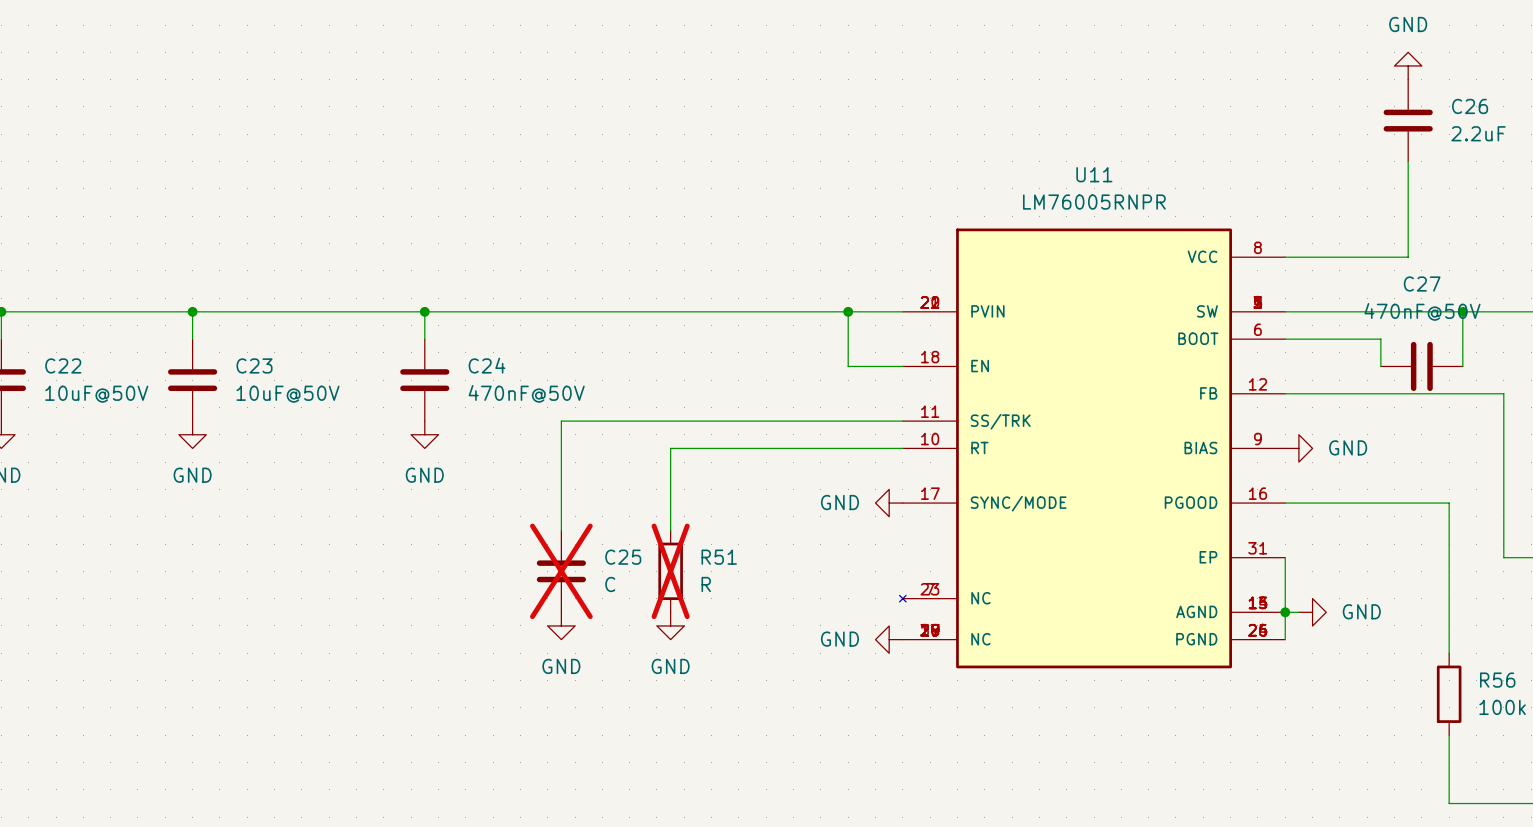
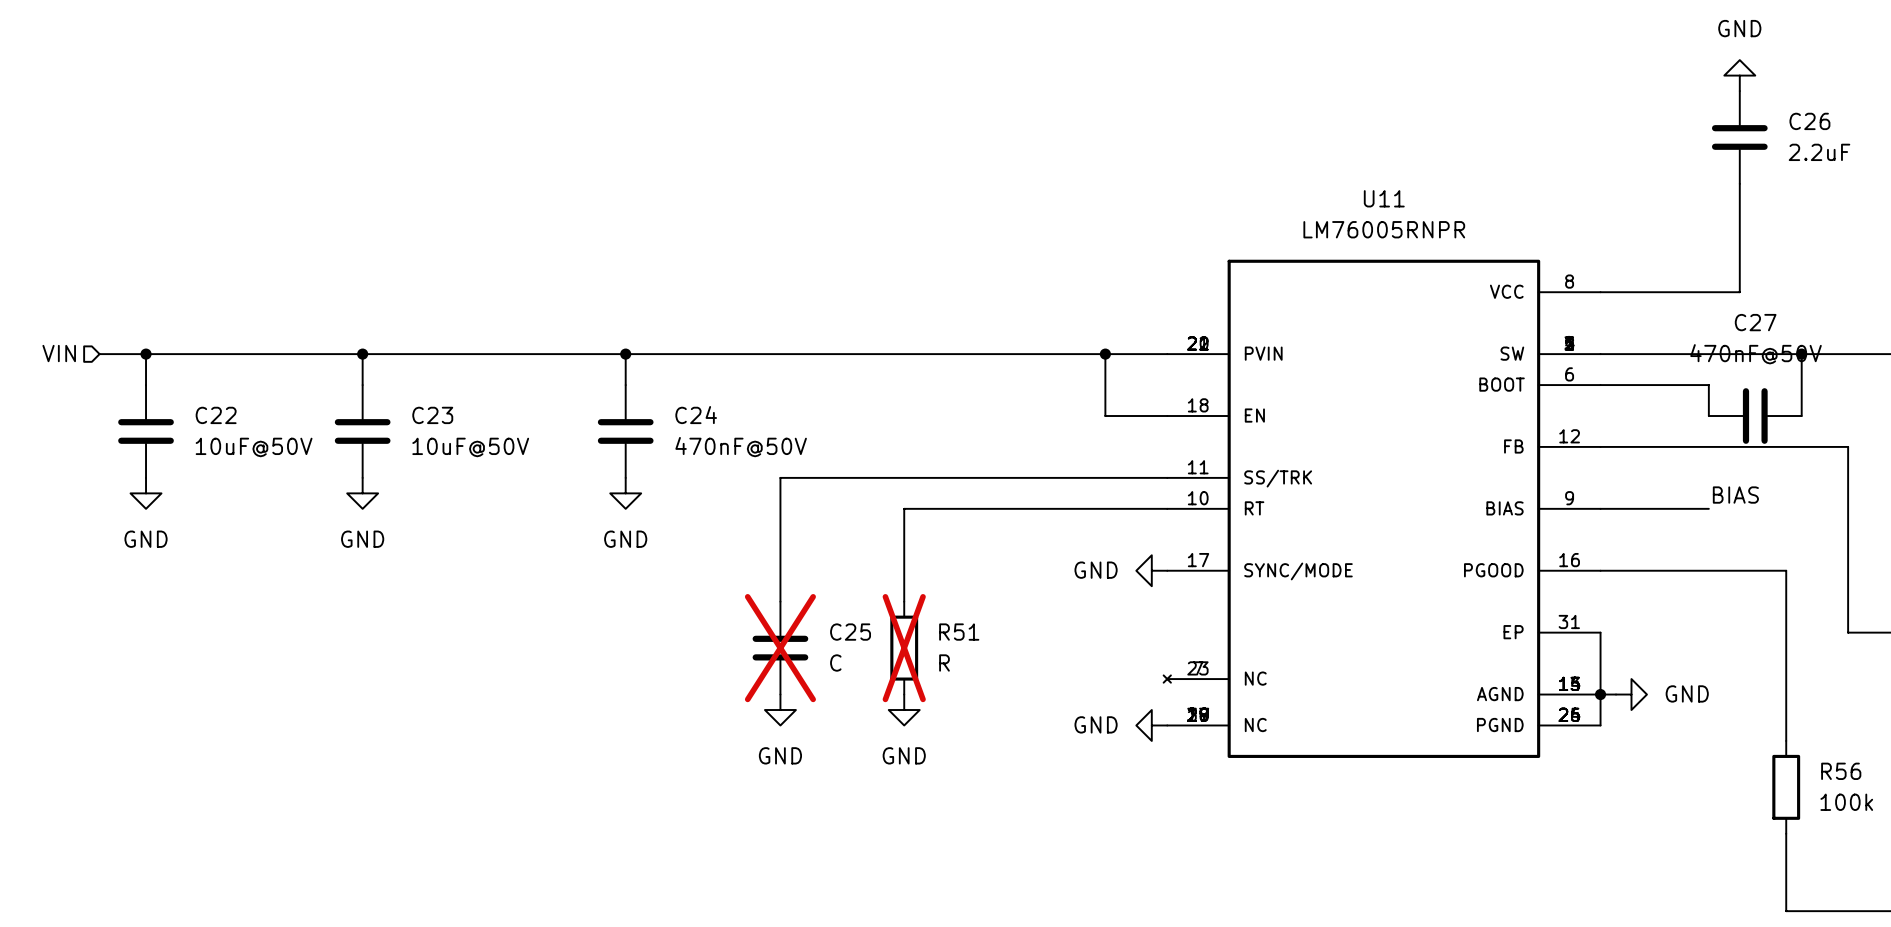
label: none -> BIAS (1735, 495)
wire: none -> (1600, 508) (1708, 508)
power symbol: GND (1298, 448) -> none

